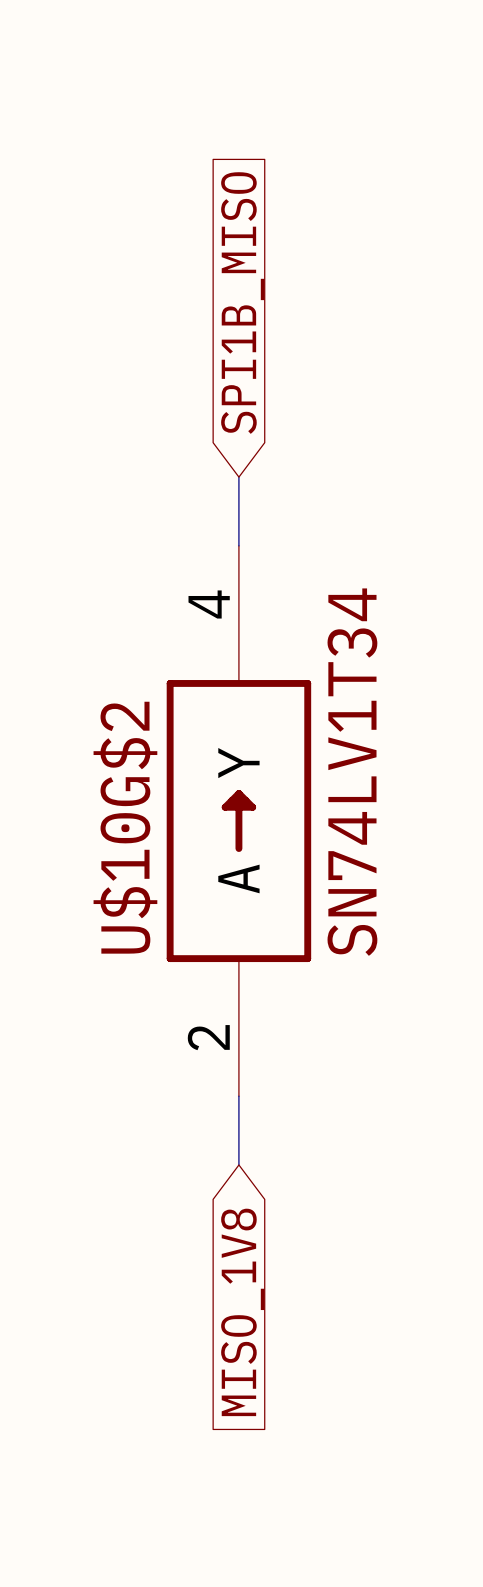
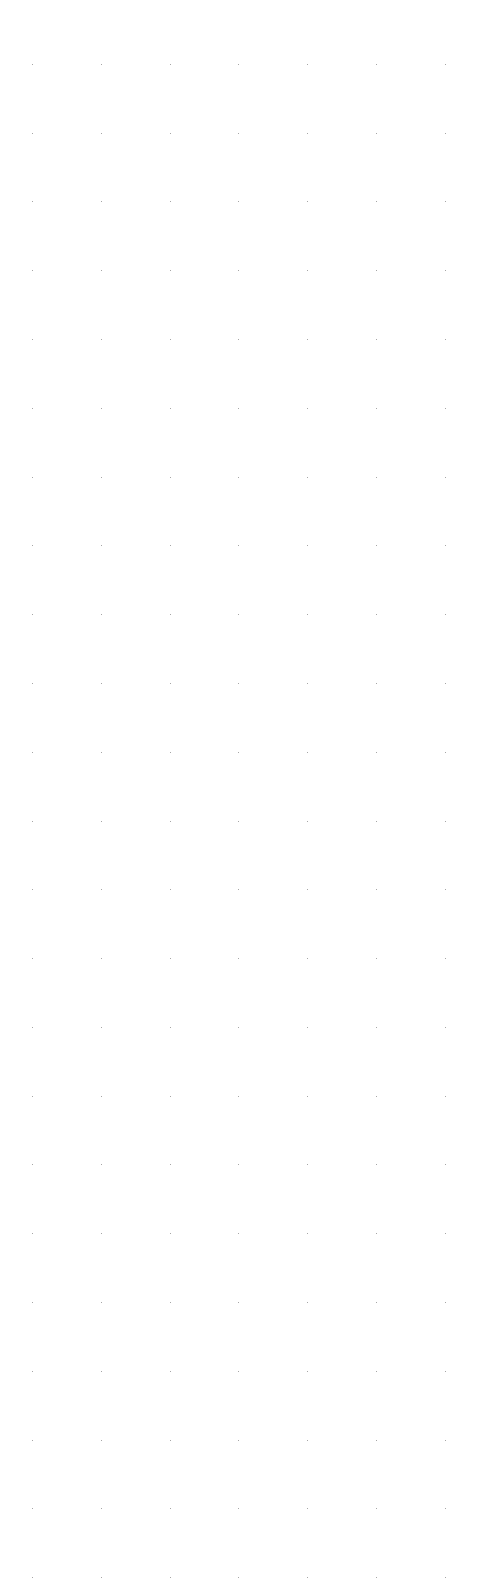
global label: SPI1B_MISO (242, 303) -> none
wire: (238, 477) (238, 545) -> none
U$10G$2: SN74LV1T34 (238, 821) -> none
wire: (238, 1096) (238, 1164) -> none
global label: MISO_1V8 (242, 1312) -> none

